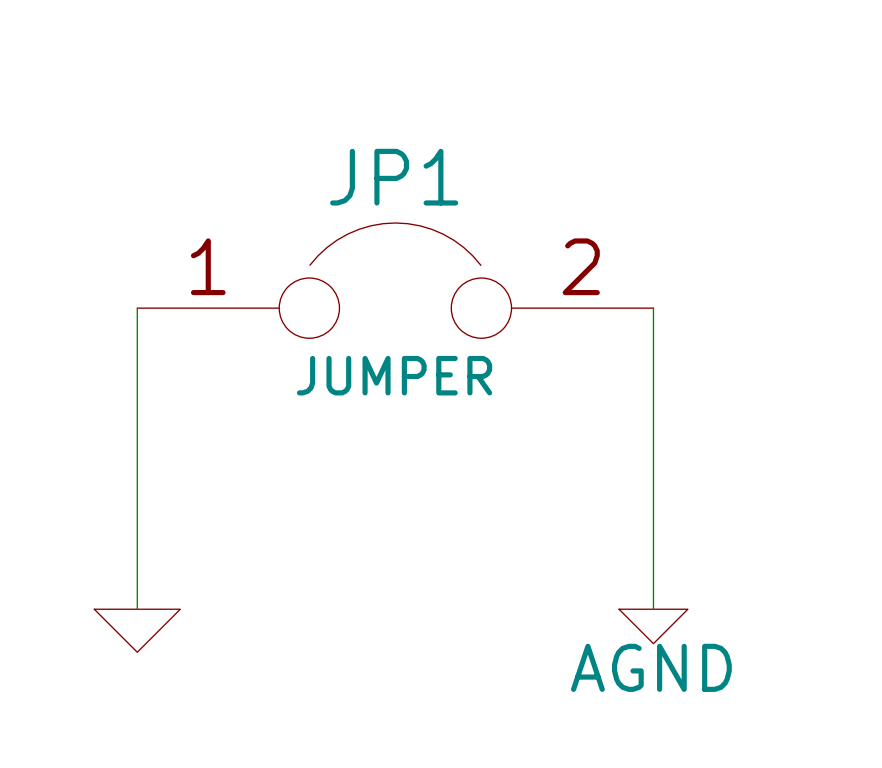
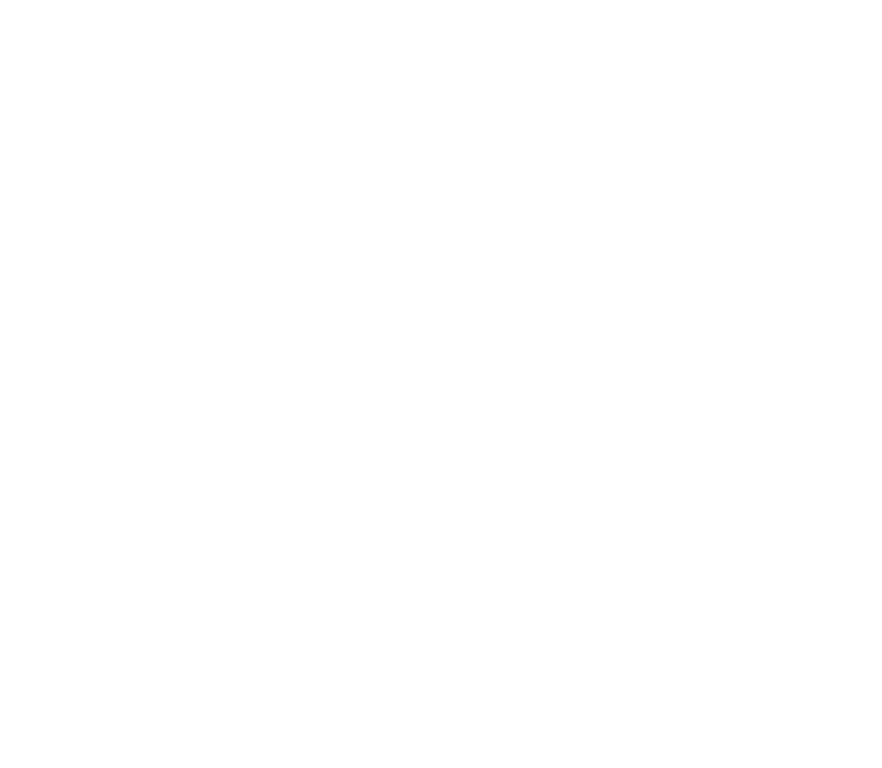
JP1: JUMPER (395, 280) -> none
wire: (137, 308) (137, 609) -> none
wire: (653, 308) (653, 609) -> none
power symbol: AGND (653, 626) -> none
power symbol: (137, 630) -> none

